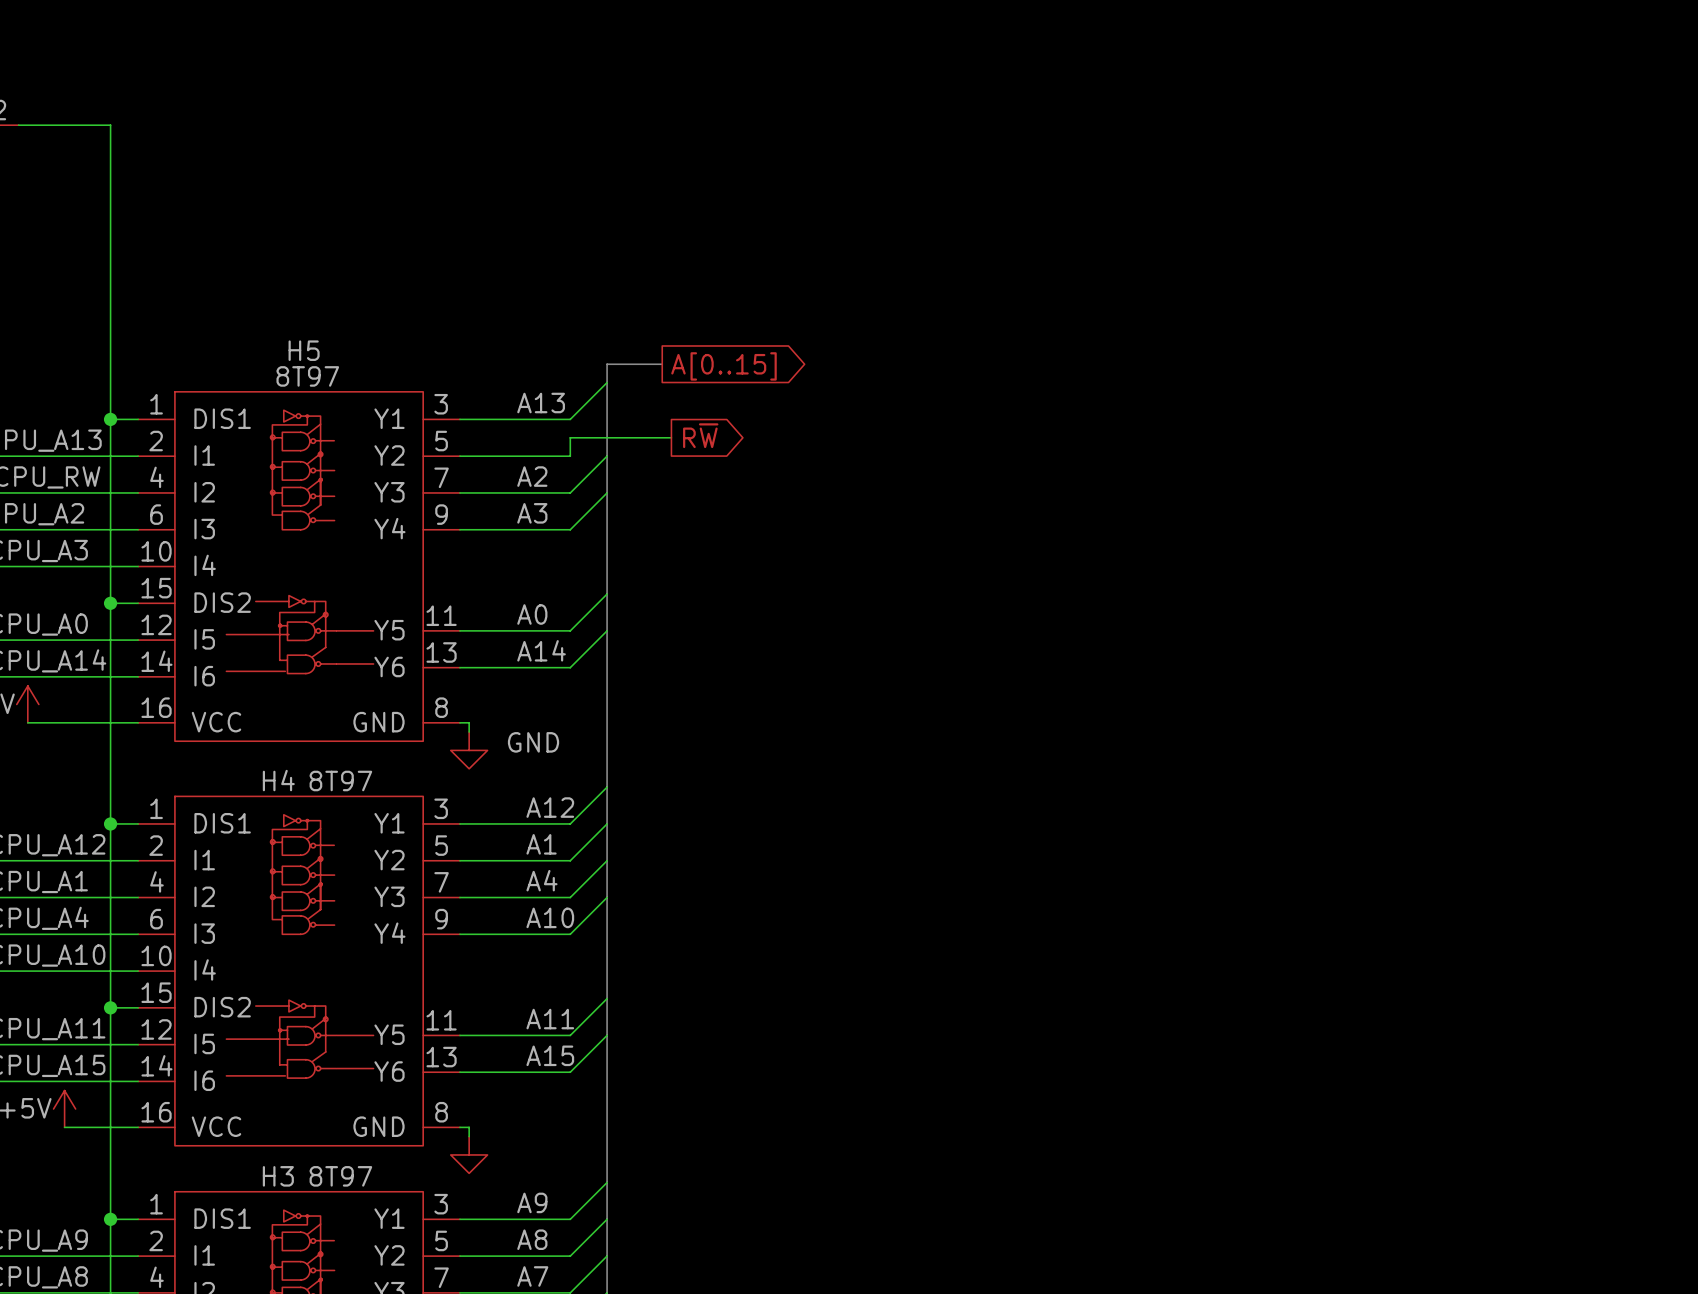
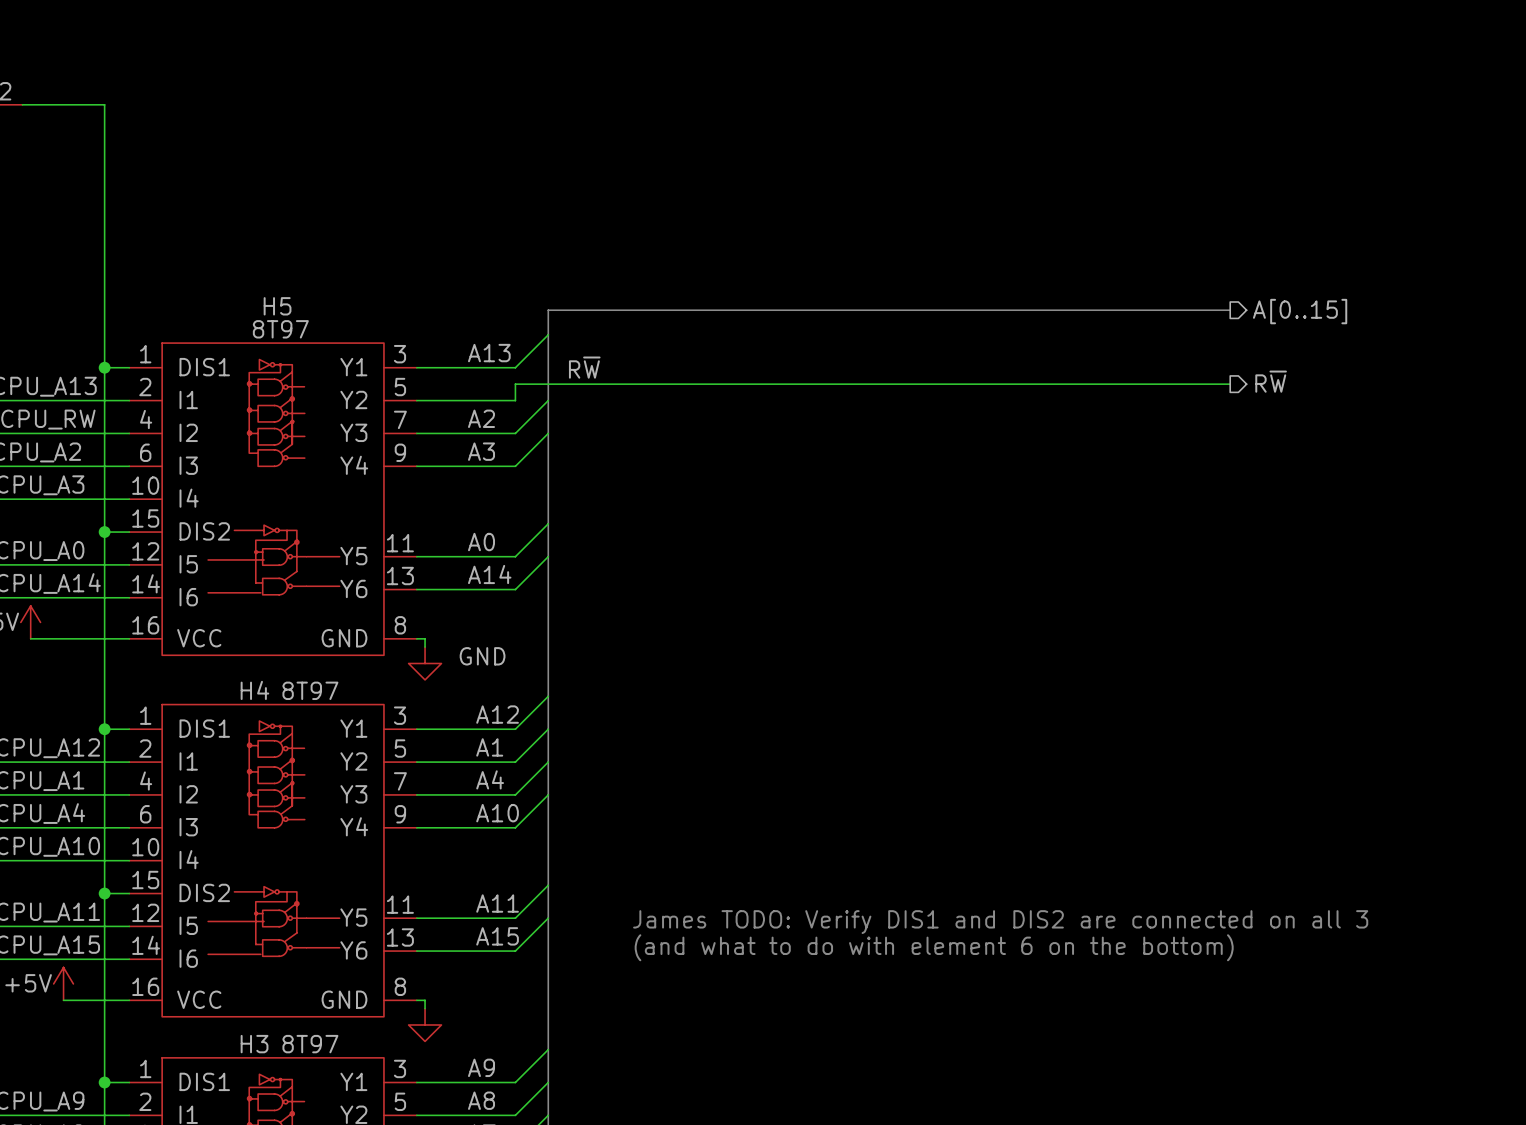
hierarchical label: none -> A[0..15] (1300, 311)
bus: (607, 364) (662, 364) -> (548, 318) (548, 310) (1230, 310)
global label: A[0..15] (724, 366) -> none
label: none -> R~{W} (584, 367)
global label: R~{W} (700, 435) -> none
hierarchical label: none -> R~{W} (1271, 381)
wire: none -> (605, 384) (1230, 384)
text: none -> James TODO: Verify DIS1 and DIS2 are connected on all 3 (1000, 922)
text: none -> (and what to do with element 6 on the bottom) (934, 947)

